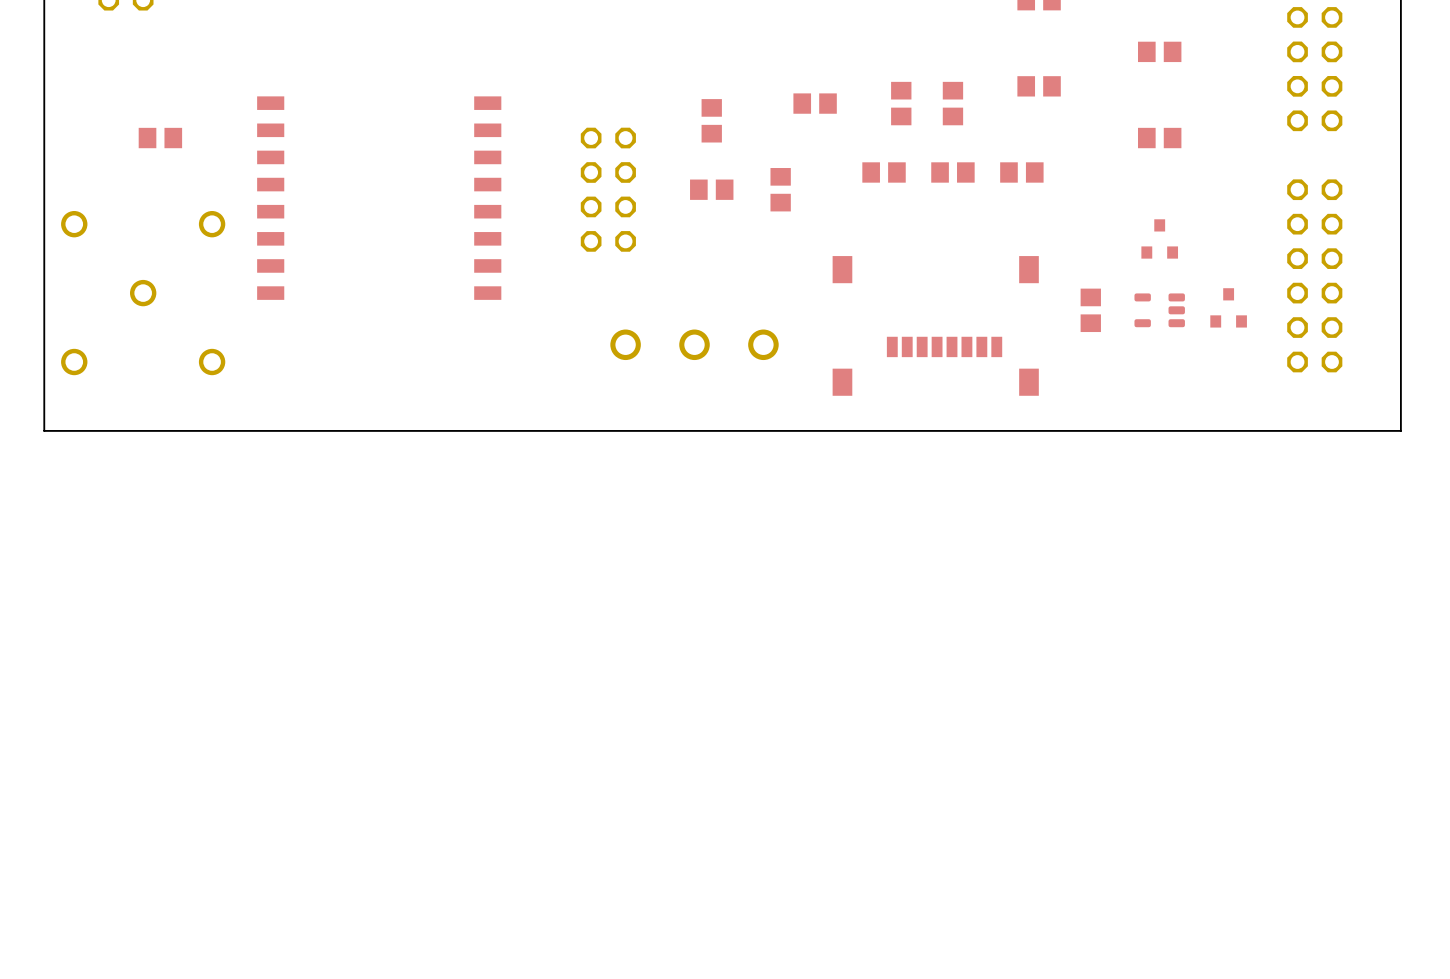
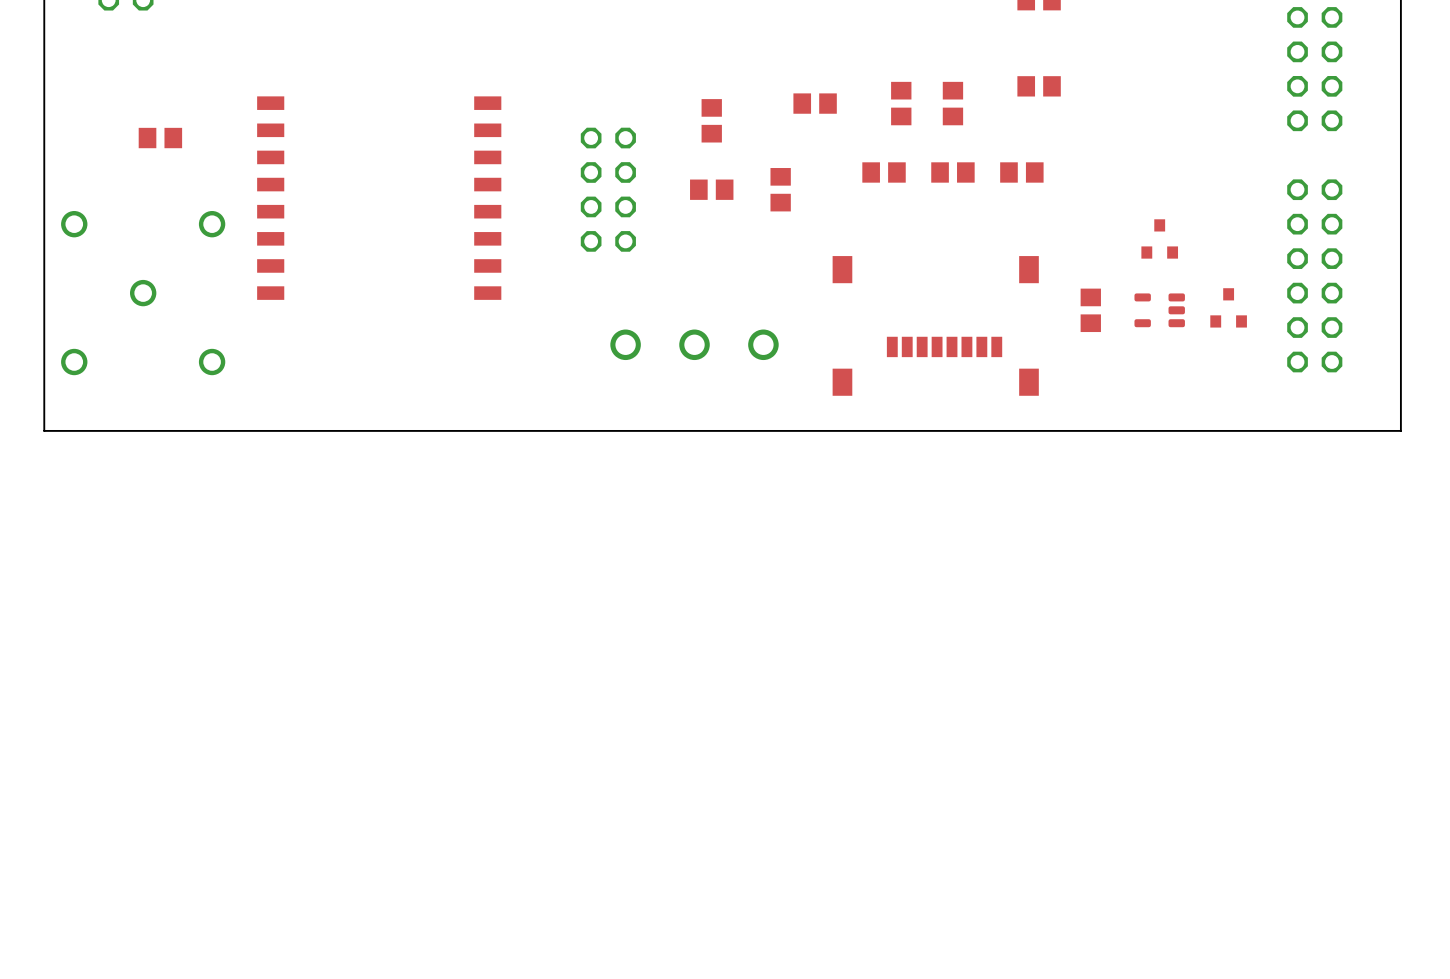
part: (1159, 51) -> none
part: (1159, 138) -> none

